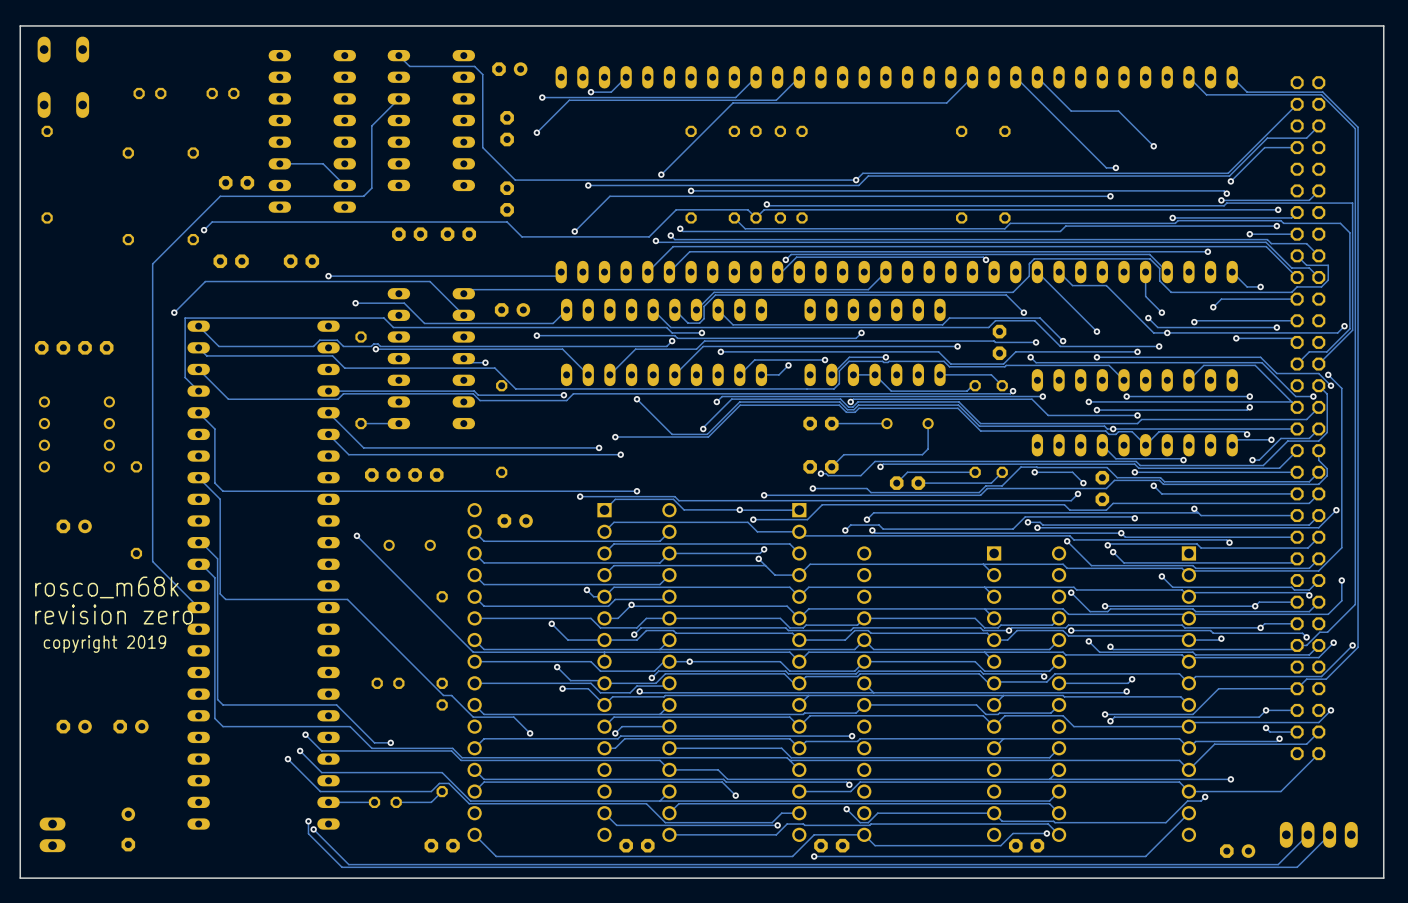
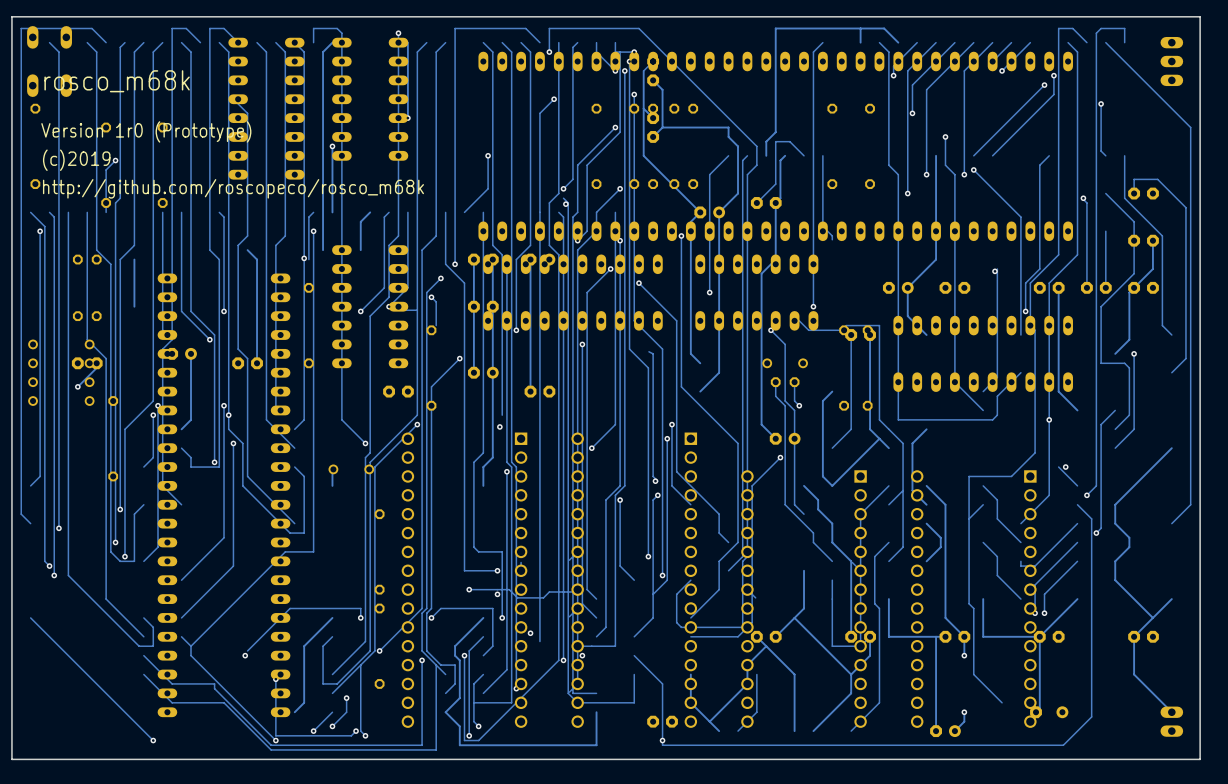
track: none -> (860, 28) (860, 42)
track: none -> (398, 33) (398, 235) (389, 245) (389, 297) (370, 316) (370, 452) (365, 457) (365, 641) (332, 674)
via: none -> (398, 33)
track: none -> (49, 42) (58, 52) (58, 528)
track: none -> (87, 42) (96, 52) (96, 250) (110, 264) (110, 551) (120, 561) (134, 561) (134, 514) (143, 504)
track: none -> (106, 42) (91, 28) (21, 28) (21, 514) (30, 523)
track: none -> (124, 42) (120, 47) (120, 198) (115, 202) (115, 542)
track: none -> (143, 42) (134, 52) (134, 245) (120, 259) (120, 509)
track: none -> (162, 42) (153, 52) (153, 401) (124, 429) (124, 556)
track: none -> (181, 42) (191, 52) (191, 311) (214, 335) (214, 462)
track: none -> (200, 42) (186, 28) (172, 28) (172, 339) (162, 349) (162, 485) (181, 504)
track: none -> (219, 42) (228, 52) (228, 429) (242, 443) (242, 485) (290, 533) (304, 533) (304, 476) (294, 467)
track: none -> (238, 42) (224, 28) (209, 28) (209, 250) (219, 259) (219, 467) (191, 467) (191, 457) (181, 448)
track: none -> (257, 42) (266, 52) (266, 419) (294, 448)
track: none -> (275, 42) (285, 52) (285, 235) (275, 245) (275, 410)
track: none -> (294, 42) (304, 52) (304, 419) (294, 429)
track: none -> (313, 42) (313, 28) (337, 28) (341, 33) (341, 419) (365, 443)
track: none -> (332, 42) (323, 52) (323, 250)
track: (398, 55) (409, 66) (474, 66) (482, 74) (482, 147) (515, 180) (856, 180) (862, 173) (1228, 173) (1297, 104) -> none
track: none -> (407, 42) (407, 118)
track: none -> (445, 42) (436, 52) (436, 235) (422, 250) (422, 608) (379, 650)
track: none -> (483, 42) (492, 52) (492, 245) (502, 254) (502, 415)
track: none -> (502, 42) (511, 52) (511, 462) (516, 467) (516, 688)
track: none -> (521, 42) (530, 52) (530, 245) (516, 259) (516, 330)
track: none -> (539, 42) (525, 28) (455, 28) (455, 264)
track: none -> (577, 42) (572, 47) (572, 179) (563, 188)
track: none -> (596, 42) (596, 52) (615, 70)
track: none -> (615, 42) (615, 52) (634, 52)
track: none -> (822, 42) (813, 52) (813, 306)
track: none -> (898, 42) (884, 28) (775, 28) (775, 132) (766, 141) (766, 155)
track: none -> (917, 42) (893, 66) (893, 75)
track: none -> (936, 42) (907, 70) (907, 193)
track: none -> (954, 42) (912, 85) (912, 113)
track: none -> (973, 42) (926, 89) (926, 174)
track: none -> (992, 42) (964, 70) (964, 174)
track: none -> (1011, 42) (992, 61)
track: none -> (1030, 42) (1002, 70)
track: none -> (1105, 42) (1190, 127) (1190, 504) (1171, 523)
track: none -> (1124, 42) (1124, 28) (1101, 28) (1096, 33) (1096, 485) (1086, 495)
track: none -> (549, 52) (549, 28) (638, 28) (756, 146) (756, 165) (747, 174) (747, 556) (742, 561) (742, 627) (681, 627) (676, 622) (676, 594) (690, 580)
via: none -> (549, 52)
track: none -> (620, 52) (620, 132) (587, 165) (587, 231) (577, 240)
via: none -> (634, 52)
part: (509, 69) -> none
track: (626, 77) (611, 92) (590, 92) -> none
track: none -> (629, 61) (629, 349) (648, 368) (648, 556)
via: none -> (629, 61)
track: (799, 77) (776, 100) (569, 100) (536, 132) -> none
track: (972, 77) (946, 102) (733, 102) (661, 174) -> none
track: (1015, 77) (1106, 167) (1115, 167) -> none
track: (1037, 77) (1071, 111) (1118, 111) (1153, 146) -> none
track: (1188, 77) (1206, 94) (1321, 94) (1355, 128) (1355, 604) (1327, 632) (1319, 632) (1306, 645) (1297, 645) (1293, 649) (1113, 649) (1110, 646) -> none
track: (1232, 77) (1247, 92) (1322, 92) (1358, 127) (1358, 647) (1326, 679) (1306, 679) (1297, 688) (1218, 688) (1192, 714) (1105, 714) -> none
part: none -> (1171, 61)
via: none -> (615, 70)
via: none -> (624, 70)
track: (745, 88) (735, 97) (542, 97) -> (643, 70) (643, 155) (700, 212) (690, 221) (690, 353) (700, 363)
part: none -> (653, 70)
via: none -> (1002, 70)
via: (590, 92) -> none
part: (149, 93) -> none
part: (223, 93) -> none
via: none -> (893, 75)
track: none -> (1053, 75) (1053, 94) (992, 155)
via: none -> (1053, 75)
via: (542, 97) -> none
track: (398, 98) (371, 125) (371, 188) (363, 196) (220, 196) (152, 263) (152, 561) (198, 607) -> none
track: none -> (653, 80) (662, 89) (662, 127)
text: none -> rosco_m68k (117, 81)
track: none -> (1044, 85) (973, 155)
via: none -> (1044, 85)
track: none -> (634, 94) (634, 320) (662, 349) (662, 575)
via: none -> (634, 94)
track: none -> (233, 99) (247, 113) (247, 235) (238, 245) (238, 349) (247, 358) (247, 476) (294, 523)
track: none -> (554, 99) (539, 113) (539, 641)
via: none -> (554, 99)
track: none -> (1101, 103) (1101, 151) (1105, 155)
via: none -> (1101, 103)
track: (1318, 125) (1306, 138) (1267, 138) (1229, 176) (868, 176) (858, 185) (588, 185) -> none
part: (507, 128) -> none
track: none -> (643, 108) (653, 118)
via: (536, 132) -> none
via: none -> (912, 113)
via: none -> (407, 118)
via: (1153, 146) -> none
track: (1297, 147) (1264, 147) (1230, 181) -> none
via: none -> (615, 127)
part: none -> (653, 127)
track: none -> (662, 127) (653, 136)
track: none -> (662, 127) (728, 127) (728, 136) (738, 146) (738, 193) (719, 212) (719, 372) (700, 391)
text: none -> Version 1r0 (Prototype) (146, 131)
track: (279, 163) (323, 163) (344, 185) -> none
track: none -> (945, 136) (945, 165) (954, 174) (954, 382)
via: none -> (945, 136)
via: (1115, 167) -> none
track: none -> (332, 146) (332, 212)
via: none -> (332, 146)
via: (661, 174) -> none
via: (856, 180) -> none
via: (1230, 181) -> none
part: (236, 182) -> none
track: none -> (488, 155) (488, 188) (464, 212)
via position: (588, 185) -> (488, 155)
track: none -> (728, 155) (709, 174) (709, 292)
track: none -> (785, 155) (780, 160) (780, 198) (775, 202) (775, 259) (761, 273) (761, 424) (775, 438)
track: none -> (804, 155) (789, 141) (775, 141) (775, 184) (756, 202)
track: none -> (822, 155) (822, 226) (832, 235) (832, 239)
track: none -> (936, 155) (936, 259) (907, 287) (907, 316) (926, 335)
track: none -> (1049, 155) (1039, 165) (1039, 268) (1025, 283) (1025, 311)
text: none -> (c)2019 (76, 160)
track: none -> (115, 160) (106, 169) (106, 212)
via: none -> (115, 160)
track: (691, 190) (1224, 190) (1226, 193) -> none
via: (691, 190) -> none
track: (1318, 190) (1309, 200) (1221, 200) -> none
via: (1226, 193) -> none
track: (1110, 196) (609, 196) (574, 231) -> none
via: (1110, 196) -> none
part: (507, 199) -> none
via: (1221, 200) -> none
track: none -> (973, 169) (1020, 217) (1020, 335)
via: none -> (973, 169)
track: (766, 204) (1224, 205) (1226, 203) (1352, 203) (1352, 330) (1318, 364) -> none
via: (766, 204) -> none
via: none -> (926, 174)
via: none -> (964, 174)
track: (1278, 209) (764, 209) (756, 217) (747, 209) (676, 209) (649, 236) (521, 236) (507, 222) (212, 222) (204, 230) -> none
via: (1278, 209) -> none
track: (1297, 212) (1291, 217) (1172, 217) -> none
track: (734, 217) (745, 228) (1004, 228) (1010, 223) (1175, 223) (1178, 220) (1280, 220) (1283, 223) (1340, 223) (1349, 232) (1349, 328) (1326, 351) (1309, 351) (1297, 364) -> none
via: (1172, 217) -> none
text: none -> http://github.com/roscopeco/rosco_m68k (233, 188)
via: none -> (563, 188)
track: none -> (620, 188) (596, 212) (596, 231) (577, 250) (577, 688)
via: none -> (620, 188)
track: (1276, 226) (1065, 226) (1060, 231) (682, 231) (680, 228) -> none
via: (1276, 226) -> none
via: (680, 228) -> none
via: none -> (907, 193)
track: none -> (1105, 193) (1134, 221) (1134, 273) (1101, 306) (1101, 363) (1124, 363) (1129, 368) (1129, 415) (1115, 429)
track: none -> (1134, 193) (1134, 179) (1157, 179) (1185, 207) (1185, 358) (1171, 372)
part: none -> (1143, 193)
via: (204, 230) -> none
via: (574, 231) -> none
part: (409, 234) -> none
part: (458, 234) -> none
track: none -> (563, 198) (568, 202) (568, 693) (577, 702) (634, 702) (634, 674)
track: none -> (1082, 198) (1086, 202) (1086, 287)
track: (1297, 234) (1249, 234) -> none
track: (670, 235) (674, 239) (1267, 239) (1271, 243) (1306, 243) -> (1124, 155) (1124, 198) (1132, 206)
via: (670, 235) -> none
part: none -> (766, 202)
track: (655, 240) (1266, 242) (1291, 268) (1309, 268) (1318, 277) -> none
track: none -> (30, 212) (44, 226) (44, 561) (49, 566)
track: none -> (49, 212) (54, 217) (54, 575)
track: none -> (68, 212) (68, 575) (139, 646) (153, 646) (153, 627) (143, 617)
track: none -> (87, 212) (87, 339) (106, 358) (106, 599) (143, 636)
track: none -> (181, 212) (181, 311) (209, 339)
track: none -> (219, 212) (224, 217) (224, 311)
track: none -> (313, 212) (308, 217) (308, 259)
track: none -> (370, 212) (360, 221) (360, 250)
track: none -> (389, 212) (384, 217) (384, 287) (360, 311)
track: none -> (407, 212) (407, 287) (389, 306)
track: none -> (558, 212) (563, 217) (563, 660)
track: (669, 250) (673, 246) (1266, 246) (1297, 277) -> (577, 212) (577, 165) (615, 127)
track: none -> (615, 212) (615, 424) (591, 448)
part: none -> (709, 212)
track: (1207, 251) (689, 251) (669, 272) -> none
via: (1207, 251) -> none
track: (664, 255) (647, 272) -> (572, 217) (572, 693) (596, 693)
track: (1297, 255) (1306, 265) (1328, 265) (1328, 280) (1321, 286) (1297, 286) (1291, 292) (1171, 292) (1159, 280) (1159, 268) (1150, 258) (1034, 258) (1029, 263) -> none
track: none -> (1143, 217) (1162, 235) (1162, 325) (1171, 335)
track: (785, 259) (791, 254) (1149, 254) (1167, 272) -> none
via position: (785, 259) -> (681, 235)
track: (986, 259) (983, 257) (796, 257) (781, 272) (777, 272) -> none
via: (986, 259) -> none
part: (231, 261) -> none
part: (301, 261) -> none
track: (1029, 263) (1029, 276) (1013, 292) (714, 292) (696, 309) -> none
track: none -> (40, 231) (40, 476) (30, 485)
via: none -> (40, 231)
track: none -> (313, 231) (313, 551) (285, 551) (191, 646)
track: (561, 272) (557, 276) (328, 276) -> none
track: (885, 272) (868, 289) (467, 289) (463, 293) -> none
track: (1037, 272) (1096, 331) -> none
track: (1059, 272) (1072, 285) (1106, 285) (1153, 332) (1337, 332) (1344, 326) -> none
track: (1145, 272) (1145, 296) (1161, 312) -> none
track: (1232, 272) (1247, 286) (1260, 286) -> none
track: none -> (1105, 231) (1105, 287)
via position: (328, 276) -> (313, 231)
track: none -> (681, 235) (681, 386) (738, 443) (738, 542) (719, 561) (719, 589) (690, 617)
via: none -> (577, 240)
track: none -> (620, 240) (620, 485) (605, 500) (605, 627) (596, 636)
via: none -> (620, 240)
part: none -> (1143, 240)
track: none -> (1152, 240) (1152, 268) (1129, 292) (1129, 339) (1115, 353)
via: (1260, 286) -> none
track: none -> (247, 250) (257, 259) (257, 363)
track: (1297, 299) (1221, 299) -> (1086, 42) (1072, 28) (1058, 28) (1058, 254)
track: (355, 303) (404, 303) (424, 323) (553, 323) (566, 309) -> none
part: none -> (87, 259)
track: none -> (134, 259) (134, 306)
track: none -> (473, 259) (473, 372)
part: none -> (483, 259)
track: none -> (492, 259) (492, 457) (483, 467) (483, 485)
track: none -> (506, 259) (506, 462) (511, 467) (511, 702) (473, 702)
track: none -> (530, 259) (530, 391)
part: none -> (539, 259)
track: none -> (1051, 261) (1030, 283) (1030, 325) (1035, 330) (1035, 452) (1011, 476) (969, 476) (969, 603) (973, 608) (973, 674) (1002, 702)
via: (1213, 307) -> none
part: (512, 309) -> none
via: none -> (455, 264)
track: (653, 309) (670, 327) (988, 327) (995, 320) (1034, 320) (1060, 346) (1159, 346) -> none
track: (674, 309) (688, 323) (699, 323) (704, 318) (704, 306) (715, 295) (1006, 295) (1023, 312) -> none
track: (718, 309) (733, 324) (942, 324) (949, 318) (1040, 318) (1063, 341) -> none
track: (174, 312) (205, 281) (429, 281) (463, 315) -> none
via: (174, 312) -> none
via: (1023, 312) -> none
via: (1161, 312) -> none
track: none -> (610, 268) (587, 292) (587, 589) (596, 599)
track: (1148, 318) (1157, 327) (1276, 327) -> none
track: (1297, 320) (1194, 322) -> none
via: (1194, 322) -> none
track: (198, 326) (218, 346) (313, 346) (319, 340) (337, 340) (343, 346) (371, 346) (373, 344) (380, 346) (666, 346) (672, 341) -> none
track: none -> (440, 278) (426, 292) (426, 608) (422, 613) (422, 650) (445, 674)
via: none -> (440, 278)
via: (1344, 326) -> none
via: (1276, 327) -> none
track: none -> (638, 283) (676, 320) (676, 471) (719, 514) (719, 533) (728, 542)
via: none -> (638, 283)
via: (1096, 331) -> none
track: (701, 332) (672, 332) (666, 327) (393, 327) (384, 318) (185, 318) (185, 377) (193, 385) -> (162, 212) (162, 330)
via position: (701, 332) -> (610, 268)
track: (861, 332) (856, 338) (677, 338) (674, 335) (536, 335) -> none
via: (861, 332) -> none
via: (1167, 332) -> none
via: (536, 335) -> none
part: none -> (898, 287)
part: none -> (954, 287)
part: none -> (1049, 287)
track: none -> (1058, 287) (1058, 391) (1077, 410)
part: none -> (1096, 287)
part: none -> (1143, 287)
track: (1236, 338) (1293, 338) (1297, 342) -> none
via: (1236, 338) -> none
via: (672, 341) -> none
via: (1063, 341) -> none
part rotation: 0° (999, 342) -> 90° clockwise (860, 335)
part position: (999, 342) -> (860, 335)
track: (1036, 342) (704, 341) (696, 349) (635, 349) (609, 374) -> none
via: (1036, 342) -> none
track: (957, 346) (703, 346) (674, 374) -> none
via position: (957, 346) -> (813, 306)
via: (1159, 346) -> none
part: (52, 347) -> none
part: (95, 347) -> none
track: (198, 347) (206, 355) (332, 355) (344, 368) (494, 368) (515, 388) (834, 388) (839, 383) (839, 370) (848, 361) (944, 361) (949, 366) (1109, 365) (1123, 380) -> none
track: none -> (431, 297) (436, 301) (436, 325)
via: none -> (431, 297)
track: (375, 349) (562, 349) (588, 374) -> none
via: (375, 349) -> none
via: (720, 351) -> none
track: (1137, 351) (1015, 351) (1003, 364) (950, 364) (938, 351) (720, 351) -> none
via: (1137, 351) -> none
track: (885, 357) (849, 357) (831, 374) -> none
via: (885, 357) -> none
track: (1030, 357) (1036, 362) (1261, 362) (1295, 396) (1313, 396) -> none
via: (1030, 357) -> none
track: (1096, 357) (1260, 357) (1276, 373) (1318, 373) (1330, 385) -> none
via: (1096, 357) -> none
via: none -> (389, 306)
part: none -> (483, 306)
track: (825, 360) (754, 360) (739, 374) -> none
via position: (825, 360) -> (709, 292)
via: (485, 362) -> none
via: none -> (224, 311)
via: none -> (360, 311)
via: none -> (1025, 311)
track: (788, 365) (779, 374) (761, 374) -> none
via: (788, 365) -> none
part: none -> (87, 316)
track: (198, 369) (228, 399) (338, 399) (343, 393) (473, 393) (480, 400) (566, 400) (573, 393) (1010, 393) (1013, 391) -> none
track: none -> (794, 316) (808, 330) (841, 330) (846, 325) (879, 325) (879, 419) (903, 443) (903, 547) (888, 561)
track: (853, 374) (875, 374) (891, 391) (967, 391) (972, 385) (975, 385) -> none
track: (940, 374) (991, 374) (1002, 385) -> none
track: (1328, 374) (1341, 388) (1341, 547) (1318, 570) (1193, 570) (1188, 575) (1182, 568) (1067, 568) (1063, 564) (810, 564) (799, 575) (774, 575) (758, 558) -> none
via: (1328, 374) -> none
track: (1188, 380) (1203, 365) (1255, 365) (1297, 407) -> none
via: none -> (516, 330)
track: none -> (771, 330) (785, 344) (785, 401) (794, 410) (794, 504) (804, 514)
via: none -> (771, 330)
track: (1318, 385) (1327, 394) (1327, 432) (1318, 441) (1287, 441) (1263, 465) (1140, 465) (1136, 461) (875, 461) (860, 475) (828, 475) (820, 473) -> none
via: (1330, 385) -> none
track: (328, 391) (474, 391) (478, 395) (563, 395) -> none
track: none -> (851, 335) (851, 429) (832, 448)
track: none -> (870, 335) (870, 429) (888, 448)
via: (1013, 391) -> none
via: (563, 395) -> none
via: none -> (209, 339)
track: (1042, 396) (722, 396) (716, 401) -> none
via: (1042, 396) -> none
via: (1126, 396) -> none
track: (1249, 396) (1126, 396) -> none
via: (1249, 396) -> none
part: (1307, 396) -> none
via position: (1313, 396) -> (1134, 353)
track: (636, 399) (672, 434) (707, 434) (739, 402) (839, 402) (847, 409) (853, 409) (858, 405) (958, 405) (979, 426) (1104, 426) (1107, 428) (1297, 428) -> none
via: (636, 399) -> none
track: none -> (582, 344) (582, 603) (596, 617)
via: none -> (582, 344)
via: (716, 401) -> none
track: (850, 401) (853, 399) (1032, 399) (1048, 415) (1137, 415) -> none
via: (850, 401) -> none
via: (1088, 401) -> none
track: (1291, 401) (1088, 401) -> none
track: (1249, 407) (1247, 410) (1096, 410) -> none
via: (1249, 407) -> none
track: (1318, 407) (1306, 419) (1141, 419) (1137, 423) (980, 423) (958, 401) (858, 401) (852, 407) (848, 407) (840, 399) (731, 399) (703, 428) -> none
track: none -> (648, 351) (653, 353) (653, 476) (657, 481)
via: (1096, 410) -> none
track: (198, 412) (214, 428) (214, 483) (223, 491) (636, 491) -> none
part: none -> (181, 353)
track: none -> (191, 353) (191, 419) (181, 429)
track: (328, 412) (363, 447) (599, 447) -> none
track: none -> (1134, 353) (1134, 429) (1115, 448)
via: (1137, 415) -> none
track: none -> (459, 358) (431, 386) (431, 608) (426, 613) (426, 650) (440, 665) (455, 665) (455, 683) (445, 693)
via: none -> (459, 358)
part: none -> (87, 363)
track: none -> (96, 363) (96, 368) (77, 386)
part: none -> (247, 363)
track: (398, 423) (361, 423) -> none
part: (820, 423) -> none
track: (886, 423) (831, 423) -> none
track: (928, 423) (928, 449) (922, 454) (843, 454) (831, 466) -> none
via: (703, 428) -> none
via: (1113, 428) -> none
track: (1318, 428) (1309, 438) (1280, 438) (1259, 460) (1252, 460) -> none
track: (328, 434) (348, 454) (620, 454) -> none
part: none -> (483, 372)
track: (1247, 434) (1244, 431) (1159, 431) (1151, 439) -> (997, 268) (997, 377)
via: (1247, 434) -> none
track: (615, 437) (708, 437) (740, 405) (839, 405) (846, 412) (855, 412) (859, 408) (957, 408) (980, 431) (1105, 431) (1109, 434) (1115, 434) (1118, 431) (1132, 431) (1145, 445) -> (983, 391) (992, 382)
via: (615, 437) -> none
track: (1271, 439) (1237, 439) (1232, 445) -> none
via: (1271, 439) -> none
track: none -> (775, 382) (775, 396) (785, 405) (785, 504) (813, 533) (813, 542) (832, 561)
part: none -> (785, 382)
track: none -> (794, 382) (794, 401) (799, 405)
via: (599, 447) -> none
via: none -> (77, 386)
track: (1297, 450) (1279, 468) (1138, 468) (1134, 464) (883, 464) (880, 466) -> none
track: (1318, 450) (1318, 460) (1327, 468) (1327, 475) (1318, 484) (1163, 484) (1159, 480) (1114, 480) (1106, 488) -> (1020, 372) (997, 396) (997, 415) (992, 419) (958, 419)
via: (620, 454) -> none
part: none -> (398, 391)
part: none -> (539, 391)
track: none -> (832, 391) (822, 401) (822, 476) (832, 485) (879, 438)
track: (1115, 458) (1183, 460) -> (966, 393) (983, 410)
via: (1183, 460) -> none
via: (1252, 460) -> none
part: (820, 466) -> none
via: (880, 466) -> none
track: none -> (157, 405) (157, 547) (143, 561)
via: none -> (157, 405)
track: none -> (224, 405) (224, 537) (181, 580)
via: none -> (224, 405)
via: none -> (799, 405)
track: (975, 472) (907, 472) (896, 483) -> none
track: (1002, 472) (991, 483) (918, 483) -> none
track: (1034, 472) (1072, 472) (1083, 483) -> none
via: (1034, 472) -> none
via: (1134, 472) -> none
track: (1297, 472) (1134, 472) -> none
track: (1318, 472) (1309, 481) (1164, 481) (1160, 477) (1117, 477) (1107, 467) (1020, 467) (1002, 485) (985, 485) (979, 492) (871, 492) (866, 488) (812, 488) -> none
via: (820, 473) -> none
part: (382, 474) -> none
part: (425, 474) -> none
track: (198, 477) (220, 499) (220, 593) (225, 599) (347, 599) (443, 695) (451, 695) (473, 717) (513, 717) (530, 733) -> none
track: none -> (1115, 410) (1101, 424) (1101, 528) (1096, 533)
track: none -> (153, 415) (153, 457) (143, 467)
via: none -> (153, 415)
via: none -> (228, 415)
part: (907, 483) -> none
via: (1083, 483) -> none
track: (1153, 485) (1161, 493) (1297, 493) -> none
via: (1153, 485) -> none
via: (812, 488) -> none
track: (1037, 488) (987, 488) (980, 495) (764, 495) -> (898, 419) (898, 174) (888, 165) (888, 52) (879, 42)
part: (1102, 488) -> none
via: none -> (1049, 419)
via: (636, 491) -> none
track: none -> (417, 424) (374, 467) (374, 650) (332, 693)
via: none -> (417, 424)
track: none -> (671, 424) (671, 485) (690, 504)
via: none -> (671, 424)
track: (1078, 493) (1071, 500) (678, 500) (674, 496) (580, 496) -> none
via: (1078, 493) -> none
track: (1318, 493) (1309, 503) (1113, 503) (1106, 510) (1069, 510) (1064, 504) (822, 504) (807, 519) (753, 519) -> none
via: (764, 495) -> none
track: none -> (926, 429) (912, 443) (912, 490) (926, 504)
track: (1194, 508) (1201, 515) (1297, 515) -> none
via: (1194, 508) -> none
via: (739, 509) -> none
track: none -> (667, 438) (667, 580) (653, 594)
via: none -> (667, 438)
track: (799, 510) (684, 509) (673, 499) (615, 499) (604, 510) -> none
part: none -> (785, 438)
track: (1336, 510) (1318, 527) (1037, 527) -> none
via: (1336, 510) -> none
track: (1198, 512) (873, 512) (866, 519) -> none
track: none -> (233, 443) (233, 566) (181, 617)
via: none -> (233, 443)
via: none -> (365, 443)
track: (1318, 515) (1309, 525) (1042, 525) (1040, 522) (1027, 522) -> none
track: (1134, 518) (1025, 516) (1013, 529) (883, 529) (879, 525) (850, 525) (845, 530) -> none
via: (1134, 518) -> none
via: (753, 519) -> none
via: (866, 519) -> none
part: (515, 520) -> none
via: none -> (591, 448)
track: none -> (1171, 448) (1115, 504) (1115, 523) (1129, 537) (1129, 547) (1115, 561) (1115, 580) (1152, 617)
via: (1027, 522) -> none
part: (74, 526) -> none
via: (1037, 527) -> none
via: (845, 530) -> none
track: (872, 530) (875, 533) (1121, 533) (1125, 537) (1297, 537) -> none
via: (872, 530) -> none
track: (604, 531) (613, 522) (747, 522) (757, 531) (799, 531) (803, 535) (1069, 535) (1073, 539) (1226, 539) (1229, 542) -> none
track: (669, 531) (659, 541) (484, 541) (474, 531) -> none
track: none -> (780, 457) (752, 485) (752, 622) (738, 636) (690, 636)
via: none -> (780, 457)
via: (1121, 533) -> none
track: (356, 535) (473, 652) (789, 652) (799, 661) (808, 652) (1063, 652) (1065, 654) (1182, 654) (1188, 661) (1192, 657) (1318, 657) (1333, 642) -> none
via: (356, 535) -> none
via: none -> (214, 462)
track: (1318, 537) (1307, 548) (1201, 548) (1197, 543) (1107, 545) -> none
track: (1067, 541) (1091, 565) (1309, 568) (1318, 558) -> none
via: (1067, 541) -> none
track: (198, 542) (201, 542) (217, 558) (217, 699) (223, 704) (336, 704) (374, 742) (390, 742) -> none
track: none -> (332, 467) (332, 485)
track: none -> (1058, 467) (1077, 485)
via: (1107, 545) -> none
track: none -> (506, 471) (506, 669) (483, 693)
via: none -> (506, 471)
track: (764, 549) (760, 553) (669, 553) (659, 562) (484, 562) (474, 553) -> none
via: (764, 549) -> none
track: (1113, 552) (1123, 562) (1293, 562) (1297, 558) -> none
via: (1113, 552) -> none
track: (799, 553) (789, 543) (613, 543) (604, 553) -> none
track: (198, 564) (201, 564) (214, 577) (214, 718) (223, 726) (350, 726) (371, 748) (452, 748) (462, 757) (787, 757) (799, 769) -> none
track: none -> (804, 485) (818, 500) (818, 509) (832, 523) (832, 542) (851, 561) (851, 636)
track: (983, 564) (994, 575) -> none
track: none -> (888, 485) (860, 514) (860, 641) (855, 646) (832, 646) (832, 580)
track: none -> (926, 485) (945, 504) (945, 617) (964, 636) (964, 655)
track: none -> (983, 485) (997, 500) (997, 518) (1020, 542)
track: (765, 565) (613, 565) (604, 575) -> none
track: none -> (903, 490) (888, 504)
track: (669, 575) (659, 584) (484, 584) (474, 575) -> none
track: none -> (657, 495) (653, 500) (653, 617) (634, 636)
via: none -> (657, 495)
via: none -> (1086, 495)
track: (1161, 576) (1172, 587) (1291, 587) (1294, 589) (1309, 589) (1318, 580) -> none
via: (1161, 576) -> none
track: none -> (620, 500) (620, 566) (634, 580)
via: none -> (620, 500)
track: (1341, 580) (1341, 600) (1328, 614) (1192, 614) (1188, 618) (1184, 614) (1068, 614) (1063, 608) (808, 608) (799, 618) (787, 606) (630, 606) -> none
via: (1341, 580) -> none
track: none -> (983, 504) (969, 518)
track: none -> (1077, 504) (1091, 518) (1091, 716) (1063, 745) (662, 745) (662, 683) (634, 655)
text: rosco_m68k (106, 587) -> none
track: (984, 587) (994, 596) -> none
track: (586, 589) (593, 596) (604, 596) (613, 587) (789, 587) (799, 596) (808, 587) (1073, 587) (1076, 589) (1182, 589) (1188, 596) -> (1020, 523) (1030, 514)
via: (586, 589) -> none
via: none -> (120, 509)
track: (1071, 592) (1090, 611) (1107, 611) (1110, 608) (1192, 608) (1195, 611) (1309, 611) (1318, 602) -> none
via: (1071, 592) -> none
track: (1192, 592) (1306, 592) (1309, 595) -> (1033, 510) (1049, 495) (1049, 283) (1077, 254) (1077, 52) (1068, 42)
via: (1309, 595) -> none
track: (669, 596) (666, 599) (615, 599) (608, 606) (484, 606) (474, 596) -> none
track: (1297, 602) (1259, 602) (1255, 606) (1105, 606) -> none
track: (631, 604) (618, 618) (604, 618) -> none
via: (631, 604) -> none
via: (1105, 606) -> none
via: (1255, 606) -> none
track: none -> (926, 523) (940, 537) (940, 547) (926, 561)
track: none -> (1077, 523) (1035, 566) (1020, 566) (1020, 561)
track: (984, 608) (994, 618) -> none
via: none -> (58, 528)
text: revision zero (114, 614) -> none
track: (1059, 618) (1052, 625) (1000, 625) (998, 627) (984, 627) (975, 618) (864, 618) (857, 625) (806, 625) (803, 627) (789, 627) (780, 618) (646, 618) (636, 627) (600, 627) (590, 618) (474, 618) -> none
via: none -> (1096, 533)
track: (551, 623) (567, 640) -> (483, 212) (483, 452) (473, 462) (473, 547) (478, 551) (489, 551)
via: (551, 623) -> none
track: (1297, 623) (1264, 623) (1260, 627) (1184, 627) (1182, 625) (1068, 625) (1065, 627) (1011, 627) (1009, 630) (983, 630) (980, 627) (853, 627) (850, 630) (788, 630) (785, 627) (641, 627) (634, 634) -> none
via: (1260, 627) -> none
via: none -> (115, 542)
track: none -> (888, 542) (874, 556) (874, 603) (879, 608) (879, 702) (851, 731)
track: none -> (983, 542) (997, 556) (997, 575) (1020, 599)
via: (1009, 630) -> none
track: (1071, 630) (1210, 630) (1213, 633) (1302, 633) (1306, 637) -> none
via: (1071, 630) -> none
via: (634, 634) -> none
via: (1306, 637) -> none
track: (1221, 638) (1188, 640) (1184, 635) (1068, 635) (1063, 630) (1017, 630) (1007, 640) (994, 640) (987, 633) (871, 633) (868, 630) (854, 630) (845, 640) (799, 640) (792, 633) (676, 633) (673, 630) (646, 630) (636, 640) (582, 640) -> (502, 617) (502, 551)
via: (1221, 638) -> none
track: (474, 640) (484, 649) (854, 649) -> (728, 570) (739, 560)
track: (1059, 640) (1049, 649) (873, 649) (864, 640) (858, 645) -> (747, 155) (742, 160) (742, 556)
track: (1088, 641) (1099, 652) (1192, 652) (1195, 654) (1309, 654) (1318, 645) -> none
via: (1088, 641) -> none
via: (1333, 642) -> none
text: copyright 2019 (104, 644) -> none
via: none -> (124, 556)
via: none -> (648, 556)
track: (1352, 645) (1321, 676) (1195, 676) -> (1077, 542) (1036, 583)
via: (1352, 645) -> none
via: (1110, 646) -> none
track: none -> (1077, 561) (1044, 594) (1044, 613)
via: none -> (49, 566)
track: (539, 661) (474, 661) -> (464, 570) (464, 283) (445, 264) (445, 212)
via: none -> (497, 570)
via: (689, 661) -> none
track: none -> (804, 570) (804, 608) (775, 636)
track: (1059, 661) (1049, 671) (984, 671) (975, 661) (864, 661) (854, 671) (789, 671) (780, 661) (664, 661) (654, 671) (600, 671) (590, 661) (577, 661) -> none
via: none -> (54, 575)
track: (557, 667) (570, 680) (601, 680) (604, 683) (655, 683) (665, 673) (784, 673) (793, 683) (799, 683) (806, 676) (857, 676) (860, 673) (979, 673) (988, 683) (1046, 681) (1055, 673) (1179, 673) (1188, 683) (1194, 677) -> (1035, 613) (1035, 584)
via: (557, 667) -> none
via: none -> (662, 575)
track: (1044, 676) (1041, 673) (983, 673) (980, 671) (858, 671) (856, 673) (788, 673) (785, 671) (658, 671) (651, 677) -> none
via: (1044, 676) -> none
via: (651, 677) -> none
track: (1132, 679) (1128, 683) (1059, 683) -> none
via: (1132, 679) -> none
part: (388, 683) -> none
track: (544, 683) (474, 683) -> none
via: none -> (469, 589)
track: (562, 688) (588, 688) (604, 704) (612, 696) (665, 695) (1180, 696) (1188, 704) -> none
via: (562, 688) -> none
via: none -> (497, 594)
via: (639, 691) -> none
track: (1126, 691) (639, 691) -> none
via: (1126, 691) -> none
track: none -> (888, 599) (888, 636) (945, 636)
track: none -> (983, 599) (983, 636) (1039, 636)
track: none -> (1077, 599) (1039, 636)
track: none -> (1171, 599) (1134, 636) (1134, 674) (1171, 712)
track: (808, 695) (799, 704) -> none
track: (1003, 695) (994, 704) -> none
track: (1059, 704) (1050, 713) (998, 714) (986, 714) (976, 704) (864, 704) (856, 713) (803, 714) (484, 714) (474, 704) -> none
via: none -> (1035, 613)
via: none -> (1044, 613)
via: (1266, 710) -> none
track: (1297, 710) (1266, 710) (1259, 717) (1114, 717) (1110, 721) -> none
track: (1330, 710) (1318, 722) (1192, 722) (1188, 726) (1073, 726) (1063, 715) (1004, 715) (994, 726) (983, 715) (810, 715) (799, 726) (789, 717) (613, 717) (604, 726) -> none
via: (1330, 710) -> none
via: (1105, 714) -> none
track: none -> (30, 617) (153, 740)
track: none -> (332, 617) (304, 646) (304, 702) (294, 712)
track: none -> (360, 617) (360, 608) (290, 608) (247, 650)
via: none -> (360, 617)
track: none -> (431, 617) (440, 608) (492, 608) (492, 646) (483, 655)
via: none -> (431, 617)
track: none -> (483, 617) (455, 646) (455, 655) (459, 660) (459, 698) (445, 712) (459, 726) (459, 745) (596, 745) (596, 712)
via: none -> (502, 617)
track: none -> (794, 617) (851, 674)
via: (1110, 721) -> none
part: (74, 726) -> none
part: (131, 726) -> none
track: (669, 726) (622, 726) (615, 733) -> none
track: (1266, 727) (1270, 732) (1297, 732) -> none
via: (1266, 727) -> none
track: (1318, 732) (1306, 744) (1214, 744) (1188, 769) (1179, 760) (789, 760) -> none
via: (530, 733) -> none
track: (305, 734) (321, 750) (451, 750) (461, 760) (659, 760) (669, 769) (718, 769) (727, 779) (1230, 779) -> none
via: (305, 734) -> none
track: (852, 736) (620, 736) (618, 738) (484, 738) (474, 748) -> none
via: (852, 736) -> none
track: none -> (181, 636) (191, 646)
track: none -> (483, 636) (469, 650) (469, 735)
track: none -> (756, 636) (794, 674) (794, 731)
part: none -> (766, 636)
part: none -> (860, 636)
track: none -> (870, 636) (870, 655) (851, 674)
track: none -> (936, 636) (936, 731)
part: none -> (954, 636)
track: none -> (1039, 636) (1039, 708) (1036, 712)
part: none -> (1049, 636)
part: none -> (1143, 636)
track: (1279, 738) (1276, 741) (1195, 741) (1188, 748) (1179, 738) (860, 738) (857, 741) (806, 741) (799, 748) (789, 738) (624, 738) (615, 748) (604, 748) -> none
via: (1279, 738) -> none
via: (390, 742) -> none
part: (1307, 742) -> none
track: none -> (191, 646) (191, 655) (275, 740)
track: none -> (766, 646) (747, 665) (747, 683) (709, 721)
track: (1059, 748) (1049, 757) (791, 757) (781, 748) (712, 748) -> (624, 70) (624, 485) (615, 495) (615, 646)
track: (300, 750) (321, 772) (442, 772) (470, 801) (1049, 801) (1059, 791) -> none
via: (300, 750) -> none
via: none -> (379, 650)
track: (1318, 753) (1280, 791) (1188, 791) (1179, 782) (860, 782) (850, 791) (799, 791) -> none
track: none -> (143, 655) (172, 683) (214, 683) (214, 688) (271, 745) (422, 745) (422, 660)
track: (287, 759) (320, 791) (377, 791) -> (332, 636) (323, 646) (323, 683)
via: none -> (464, 655)
via: none -> (582, 655)
via: none -> (964, 655)
via: none -> (422, 660)
via: none -> (563, 660)
track: none -> (360, 665) (360, 731) (365, 735)
track: (474, 769) (484, 779) (723, 779) (726, 782) (846, 782) (849, 784) -> none
track: (1059, 769) (1049, 779) -> none
via: (1230, 779) -> none
track: none -> (483, 674) (473, 683) (473, 721) (478, 726)
track: none -> (690, 674) (690, 702) (719, 731)
track: none -> (756, 674) (756, 712) (738, 731)
track: none -> (851, 674) (851, 693) (813, 731)
via: (849, 784) -> none
track: none -> (275, 679) (275, 735) (351, 735) (356, 731)
via: none -> (275, 679)
track: (393, 791) (431, 791) (439, 783) (448, 783) (469, 803) (646, 803) (665, 822) (772, 822) (781, 813) (799, 813) -> (337, 683) (370, 650) (370, 462) (417, 415) (417, 52) (426, 42)
track: (442, 791) (431, 802) (396, 802) -> none
track: (474, 791) (484, 782) (722, 782) (735, 795) -> none
via: (735, 795) -> none
via: none -> (516, 688)
track: (1205, 796) (1201, 801) (1187, 801) (1165, 822) (1002, 821) (994, 813) (877, 813) (868, 822) (860, 822) (846, 809) -> none
via: (1205, 796) -> none
track: (374, 802) (328, 802) -> none
part: (385, 802) -> none
track: none -> (346, 698) (346, 712) (332, 726)
via: none -> (346, 698)
via: (846, 809) -> none
track: (604, 813) (616, 825) (777, 825) -> none
track: (1059, 813) (1049, 803) (678, 803) (669, 813) -> none
track: (1188, 813) (1145, 856) (814, 856) -> none
track: (308, 821) (308, 833) (342, 867) -> (143, 674) (172, 702) (224, 702) (271, 749) (292, 749)
via: (308, 821) -> none
track: none -> (332, 712) (313, 731)
track: none -> (964, 712) (964, 721) (954, 731)
via: none -> (964, 712)
part: none -> (1049, 712)
via: (777, 825) -> none
part: (128, 829) -> none
track: (313, 829) (348, 864) (1278, 864) (1307, 834) -> none
via: (313, 829) -> none
track: (1046, 833) (1013, 833) (1000, 845) (875, 845) (864, 834) (814, 834) (792, 856) (555, 856) -> (558, 42) (558, 193) (549, 202) (549, 245) (558, 254) (558, 660) (478, 740)
via: (1046, 833) -> none
part: (52, 834) -> none
track: (474, 834) (496, 856) (539, 856) -> (464, 655) (464, 740)
part: none -> (662, 721)
track: (1059, 834) (1048, 824) (787, 824) (776, 834) (669, 834) -> none
part: (1318, 834) -> none
track: (1329, 834) (1297, 867) (507, 867) -> (436, 665) (436, 749)
part: none -> (1171, 721)
via: none -> (332, 726)
via: none -> (478, 726)
via: none -> (313, 731)
via: none -> (356, 731)
part: (442, 845) -> none
part: (636, 845) -> none
part: (831, 845) -> none
part: (1026, 845) -> none
via: none -> (365, 735)
via: none -> (469, 735)
part position: (1237, 851) -> (945, 731)
via: none -> (153, 740)
via: none -> (275, 740)
via: none -> (662, 740)
via: (814, 856) -> none

